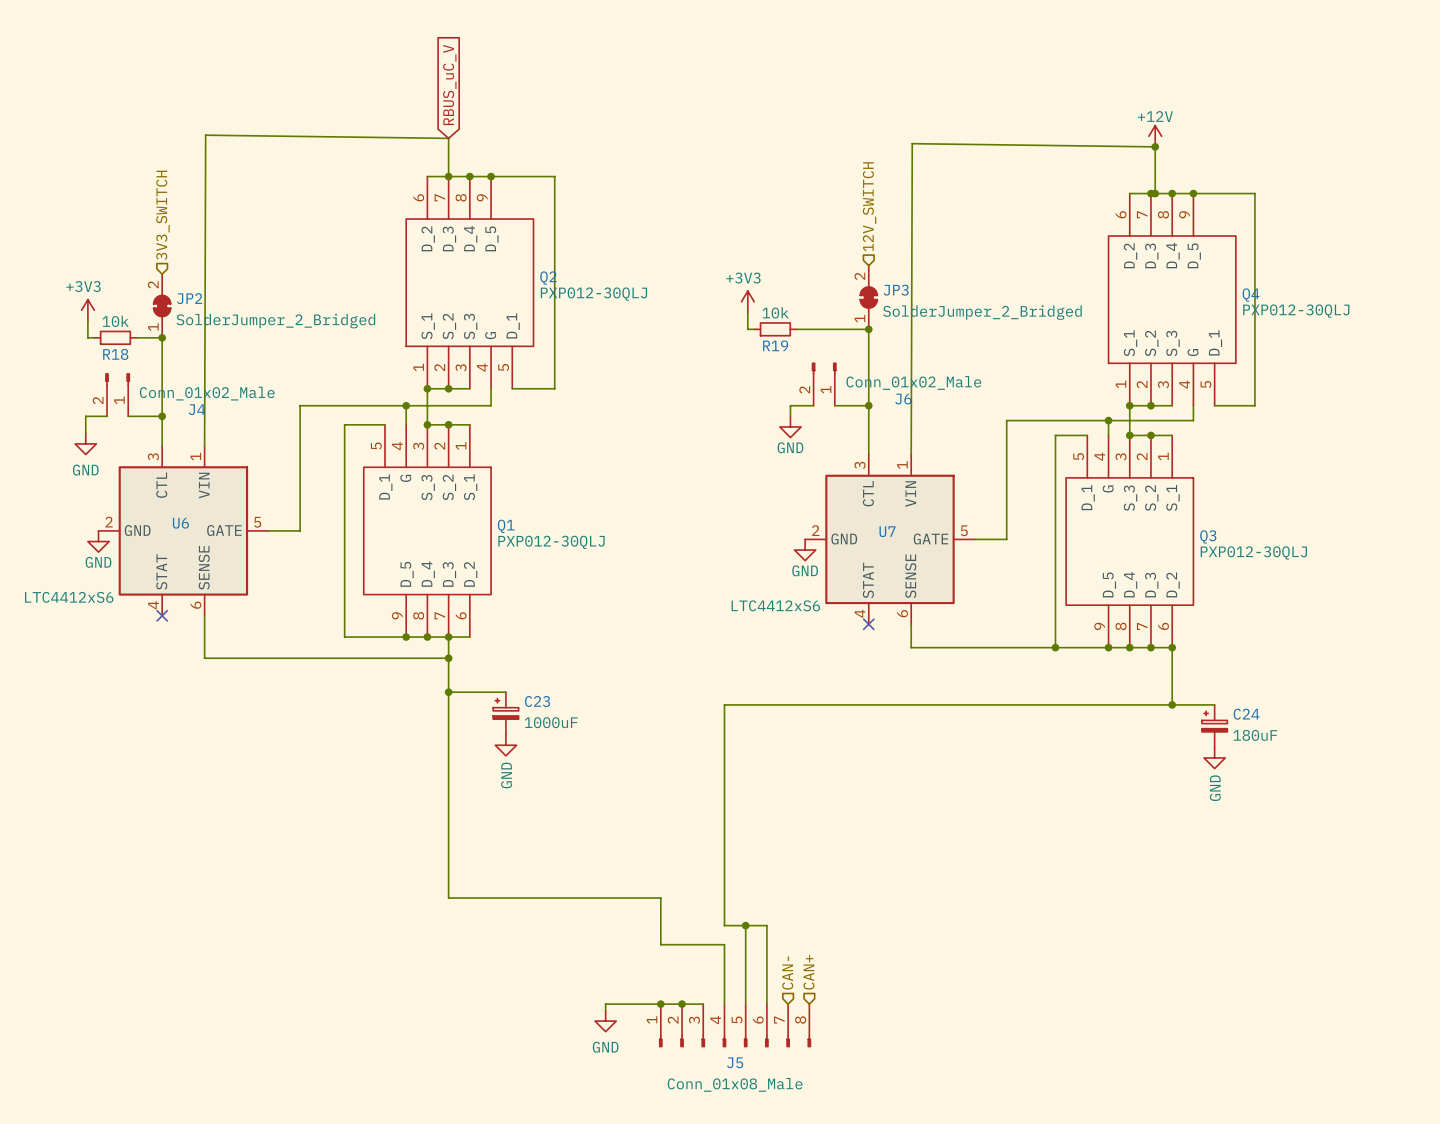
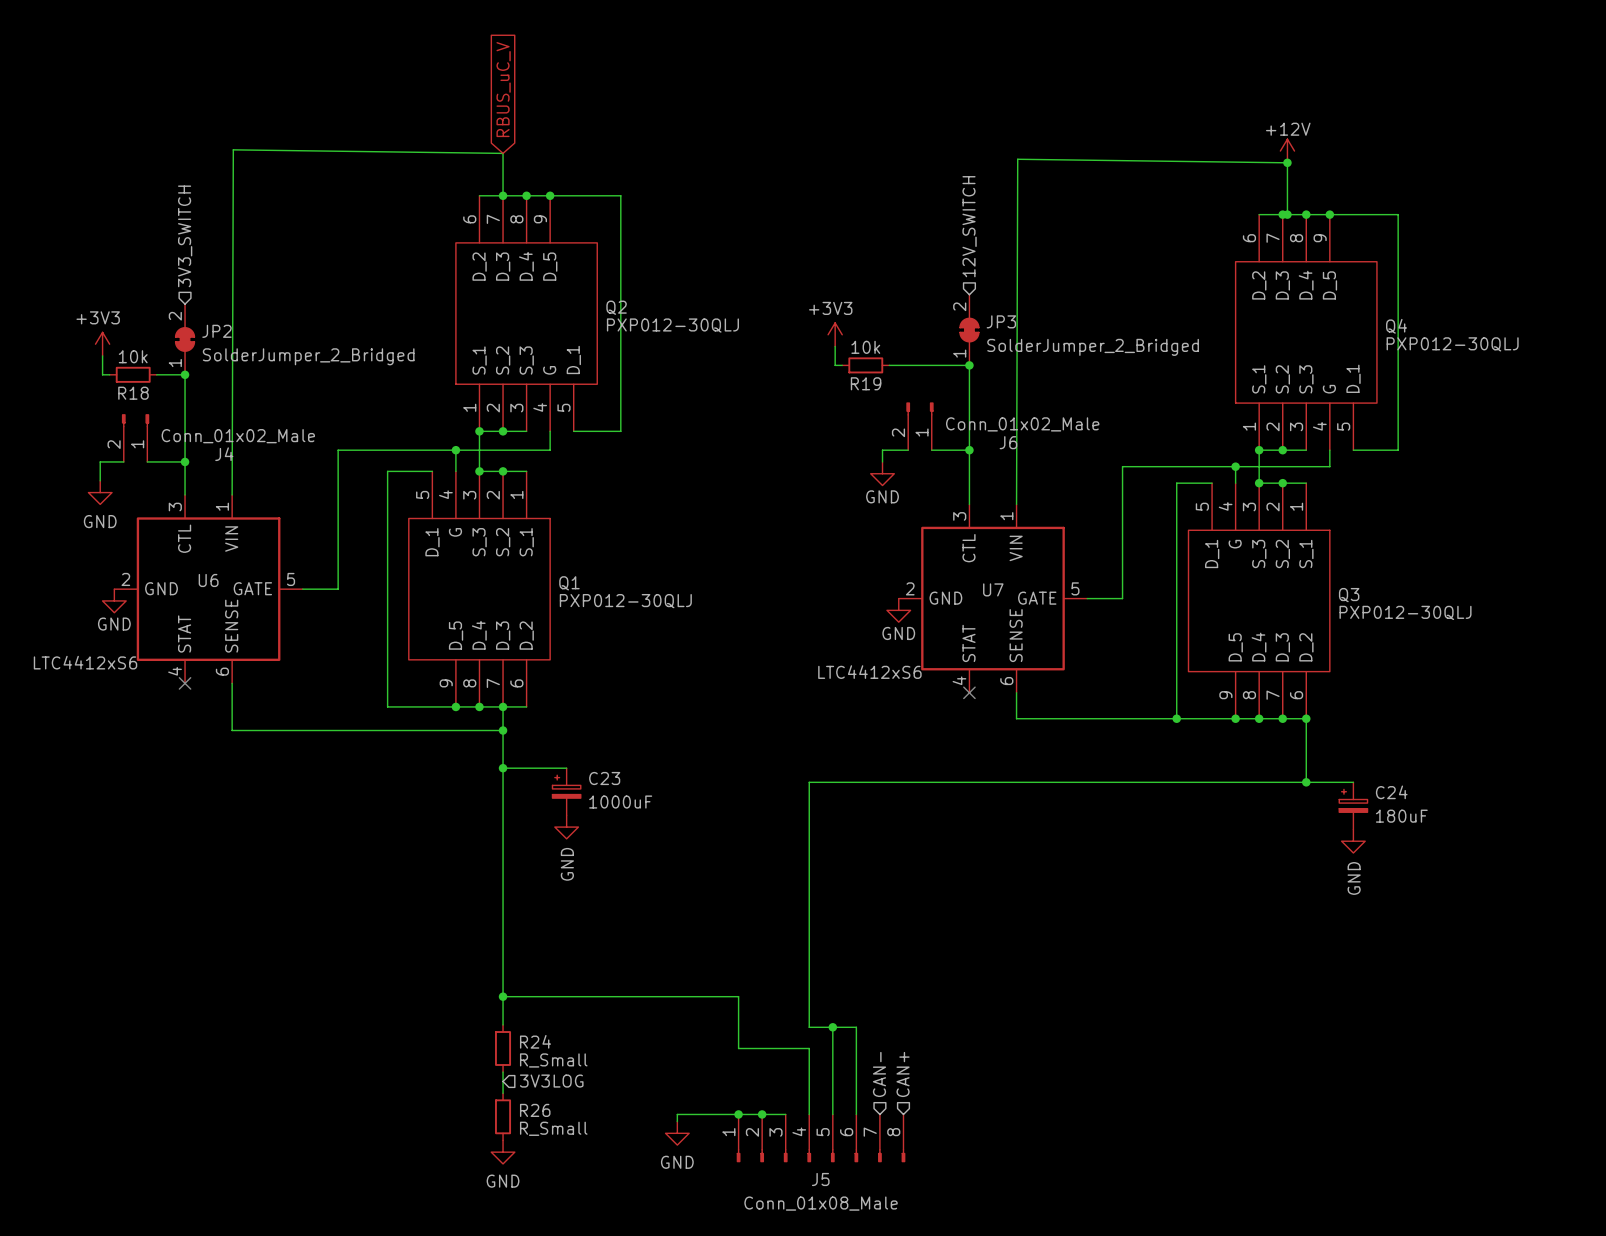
wire: none -> (503, 996) (503, 1024)
junction: none -> (503, 996)
R24: none -> R_Small (503, 1048)
wire: none -> (503, 1072) (503, 1093)
hierarchical label: none -> 3V3LOG (551, 1081)
R26: none -> R_Small (503, 1116)
power symbol: none -> GND (503, 1152)

